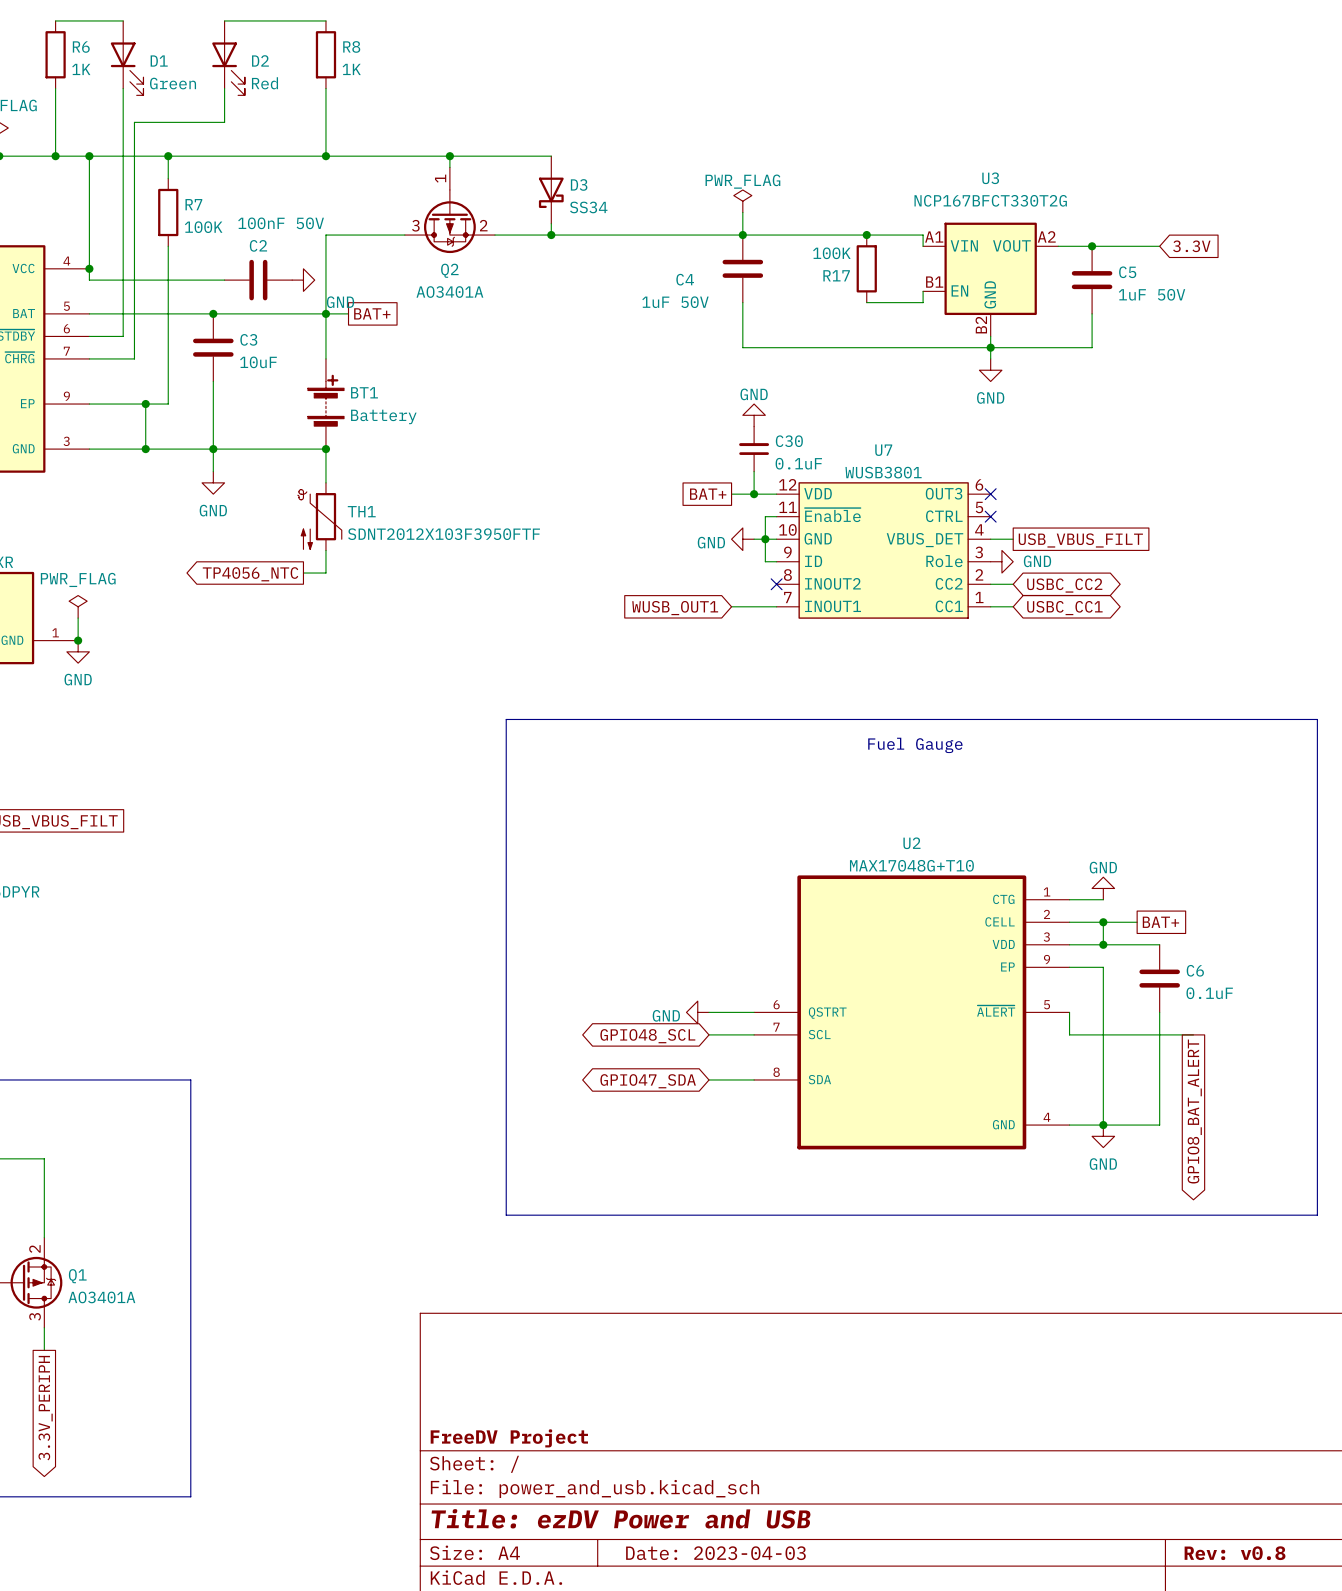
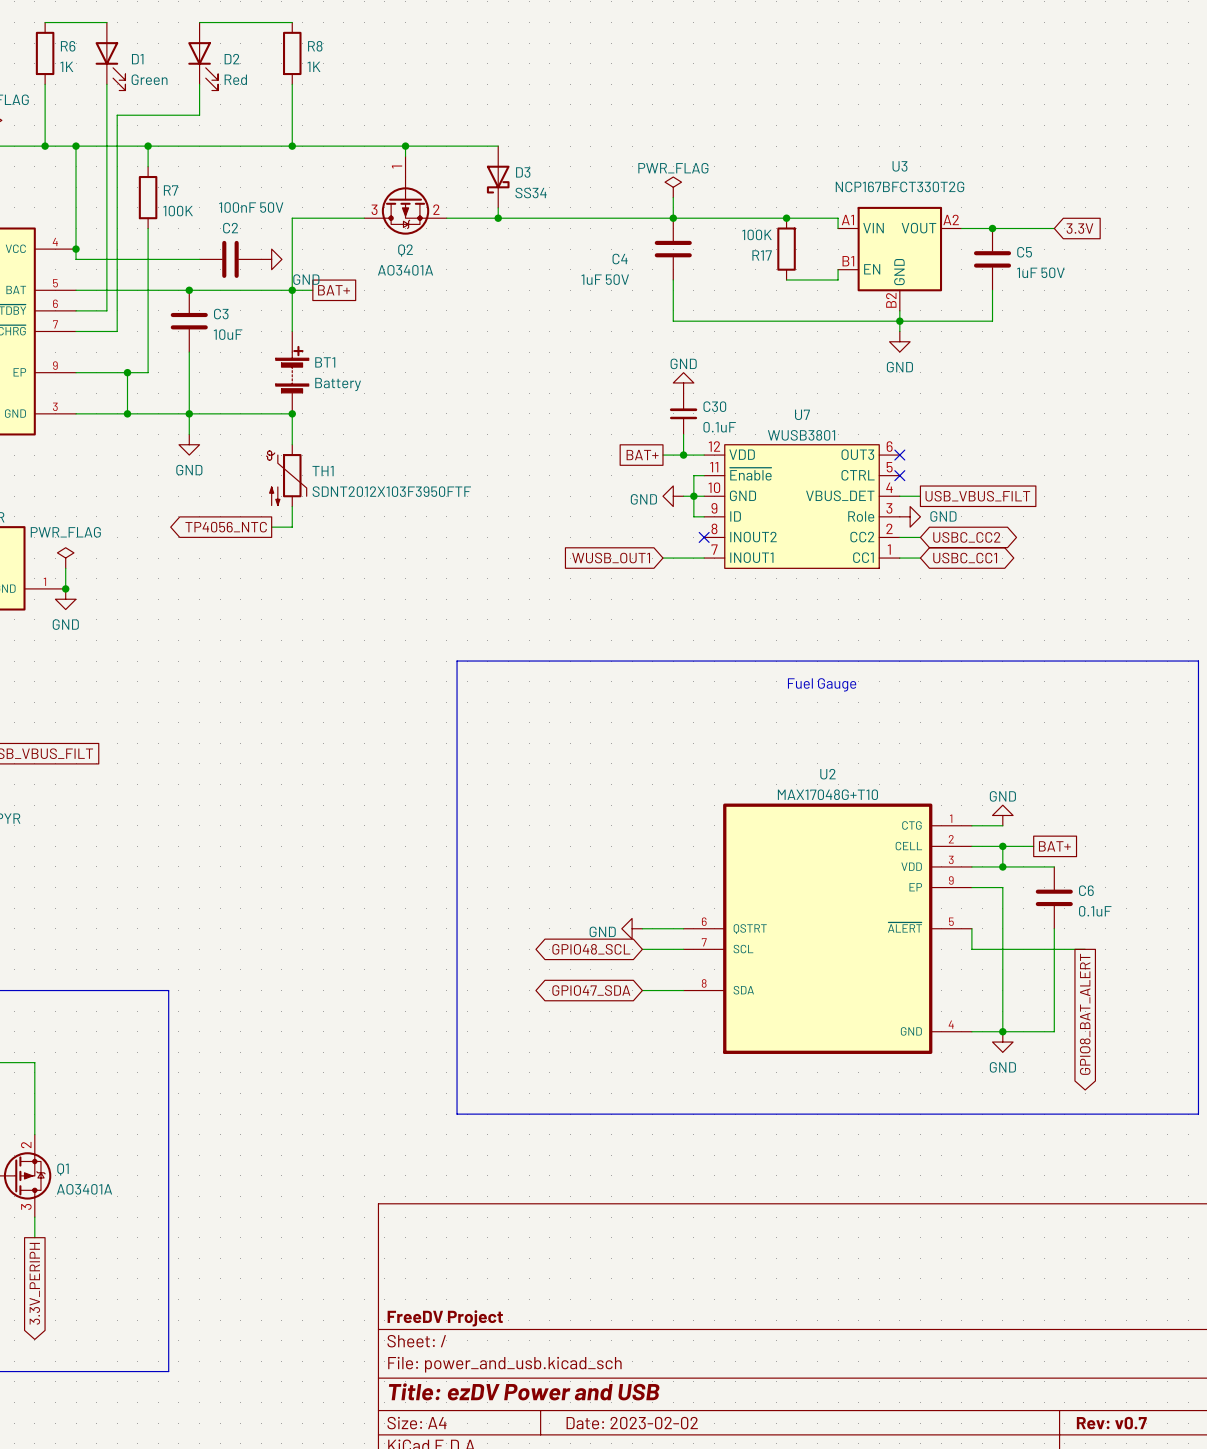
title block: Date: 2023-04-03 (715, 1553) -> Date: 2023-02-02 (632, 1423)
title block: Rev: v0.8 (1235, 1553) -> Rev: v0.7 (1111, 1423)

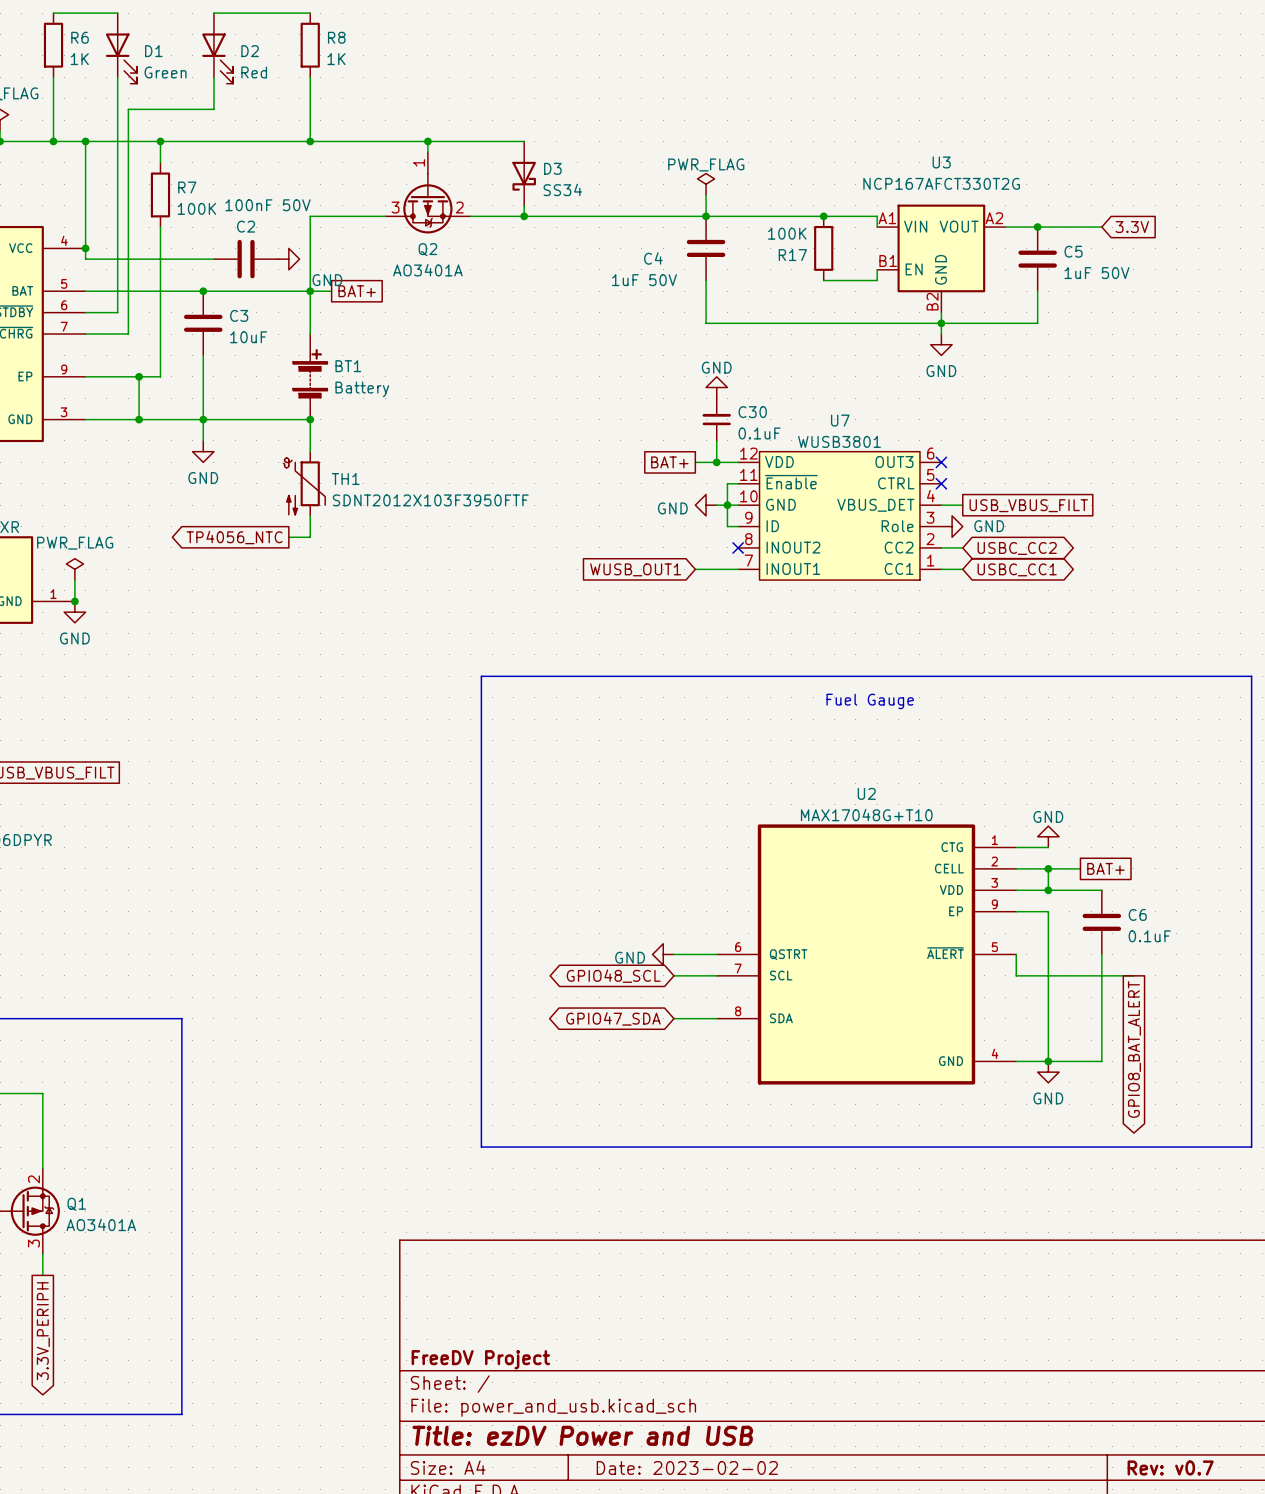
U3 value: NCP167BFCT330T2G (899, 186) -> NCP167AFCT330T2G (941, 183)

